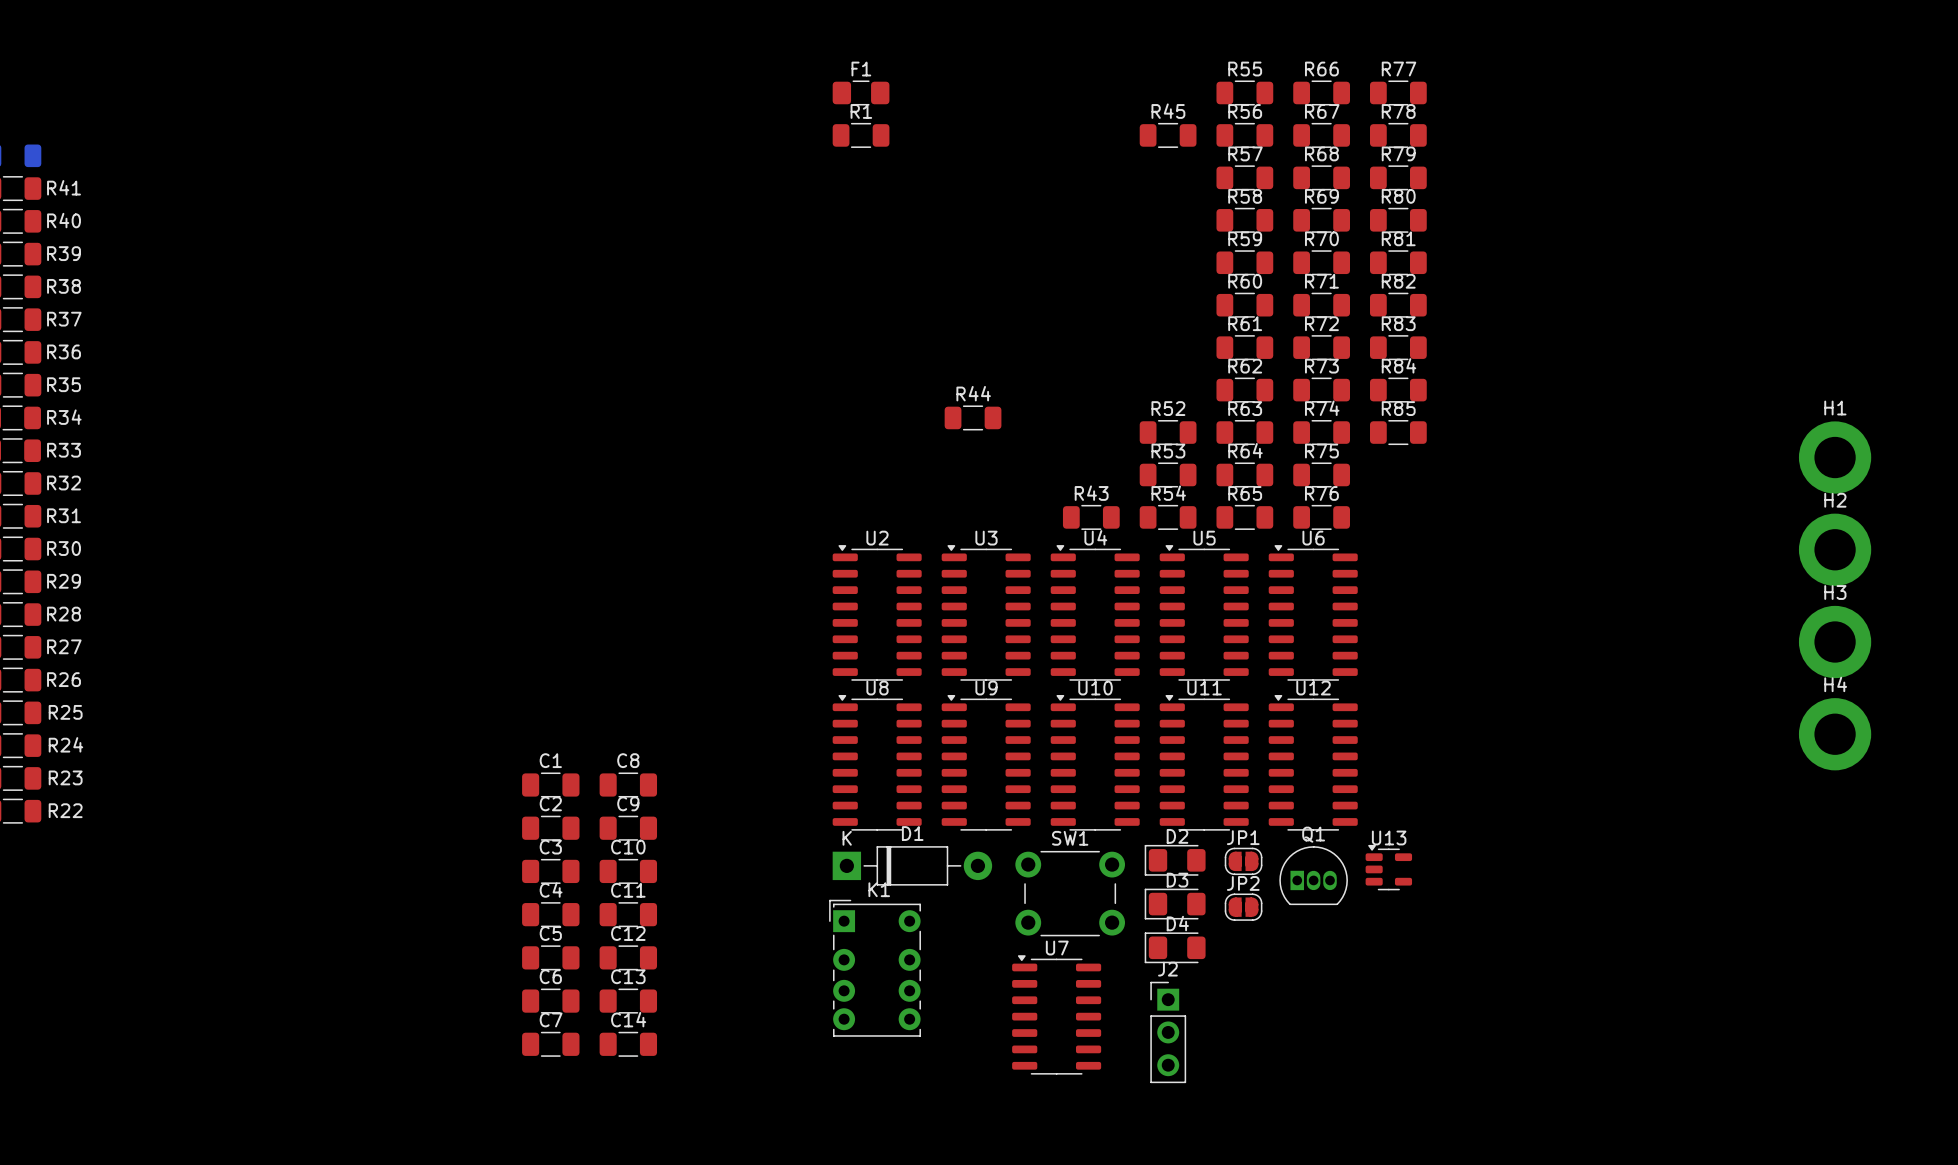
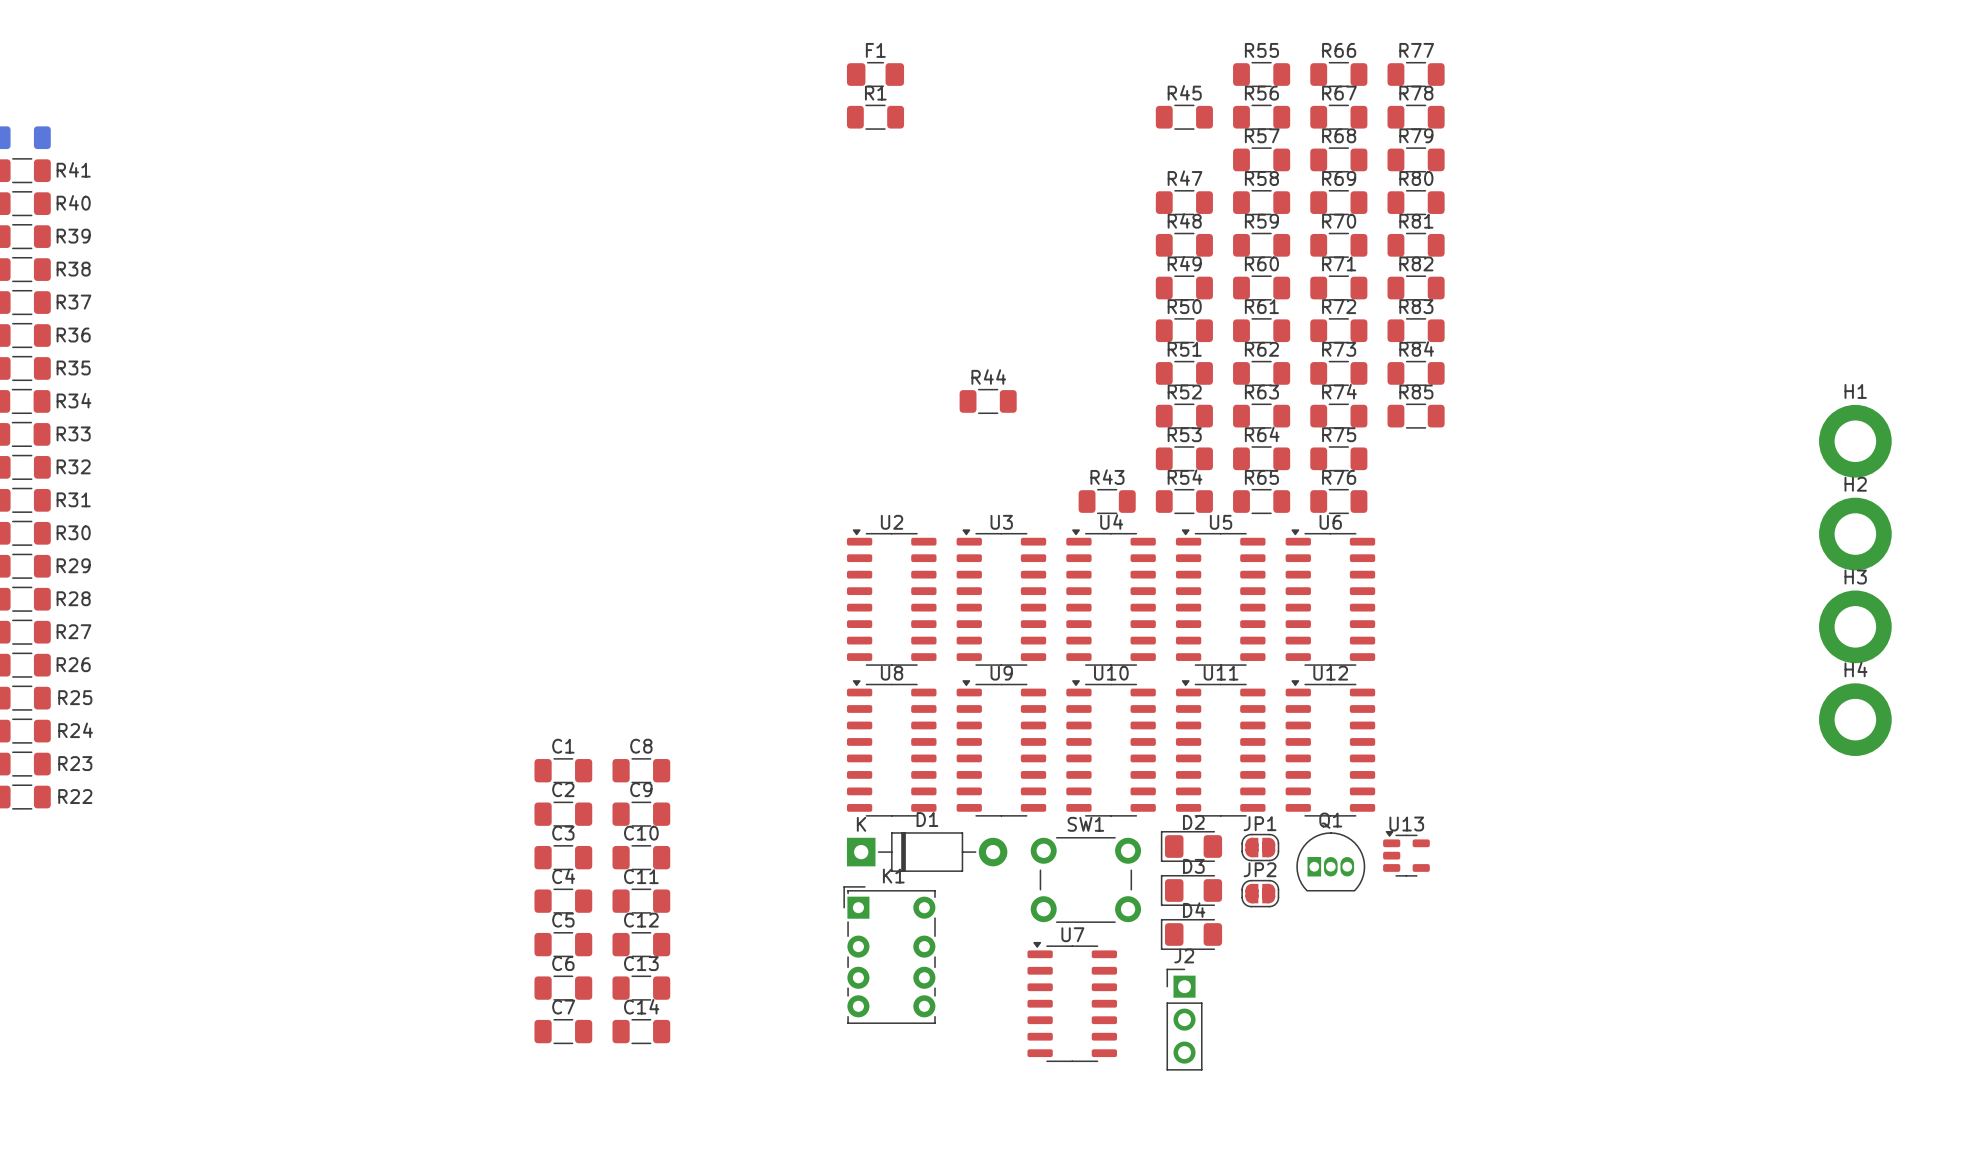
R47: none -> (1184, 202)
R48: none -> (1184, 245)
R49: none -> (1184, 288)
R50: none -> (1184, 330)
R51: none -> (1184, 373)

